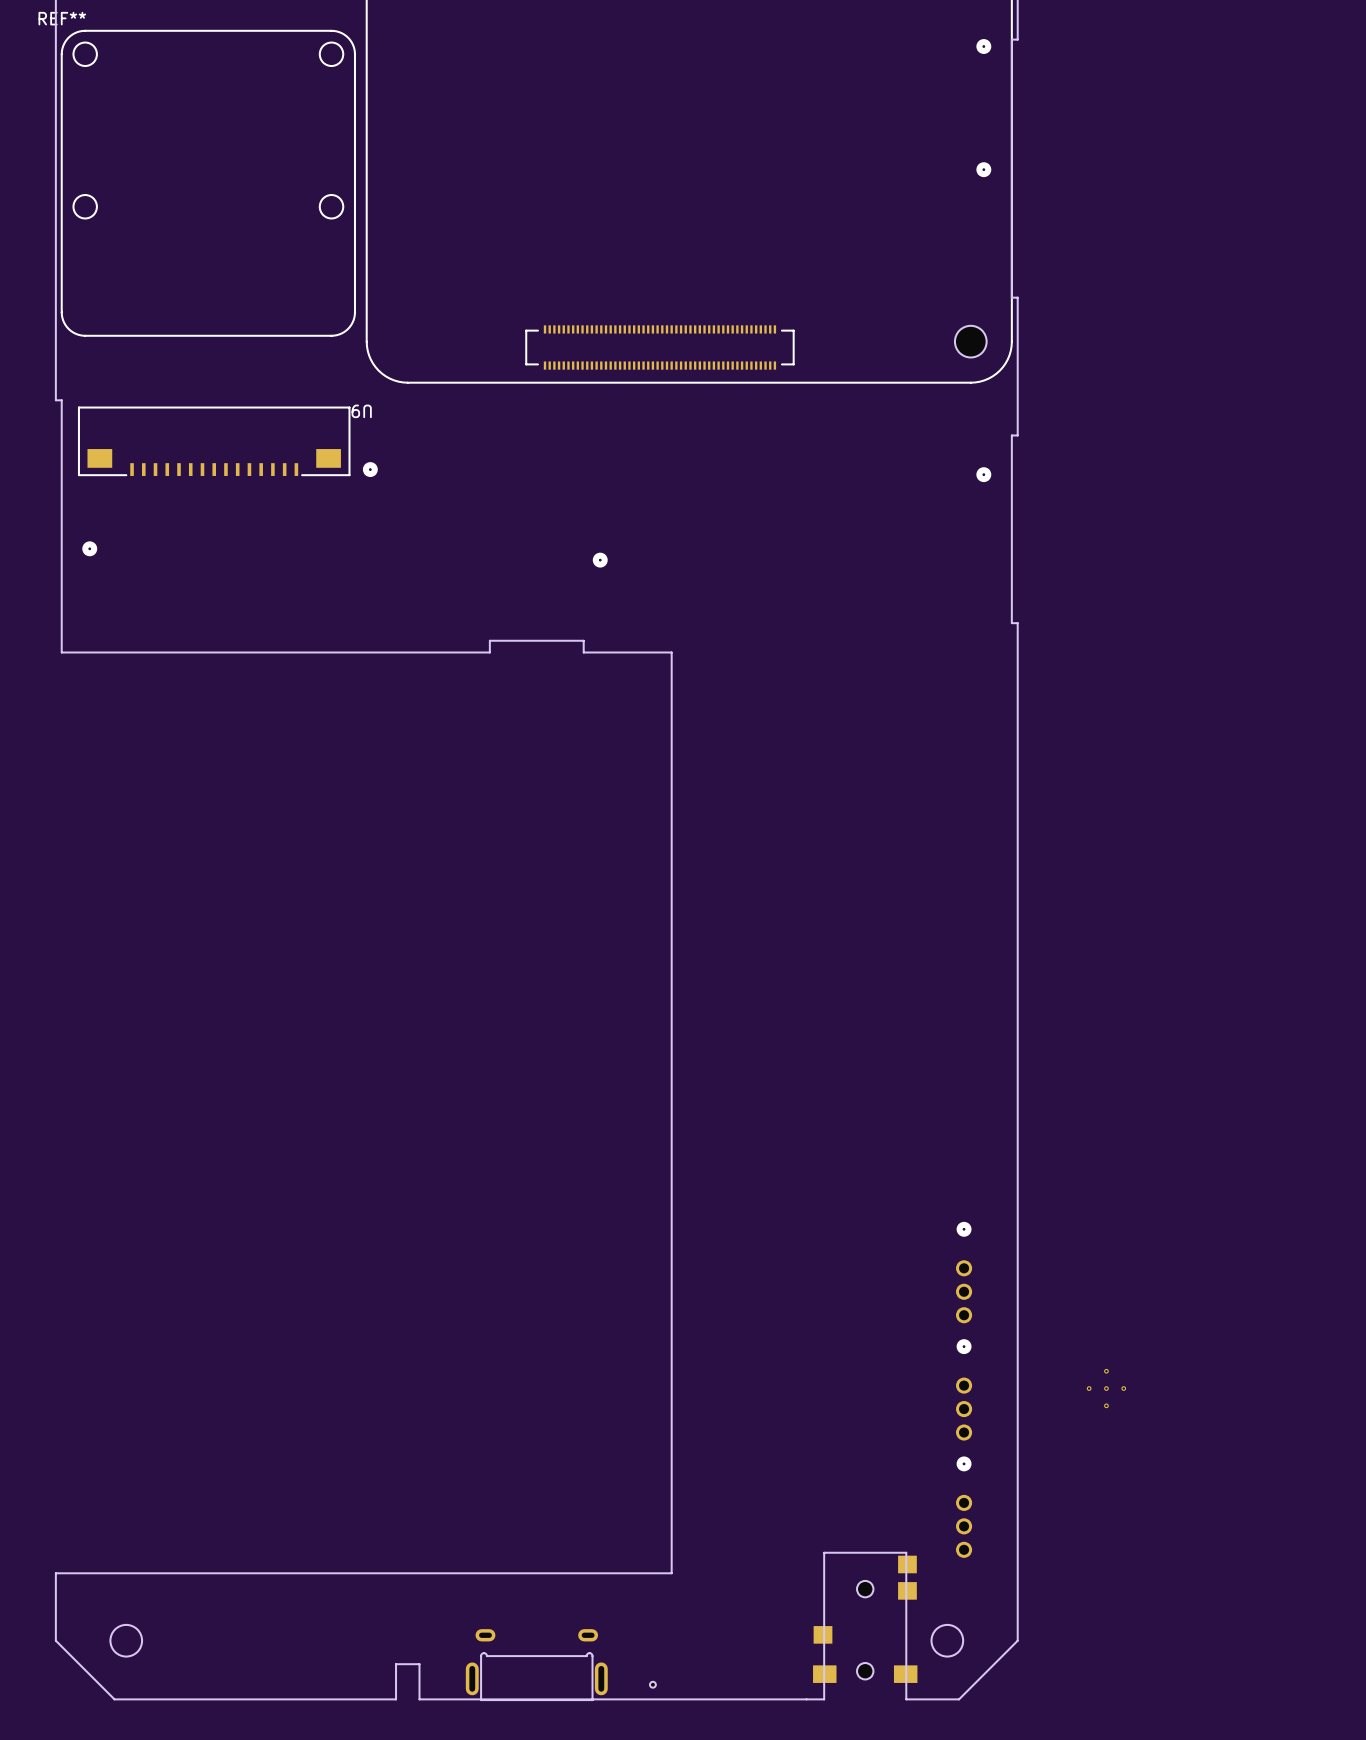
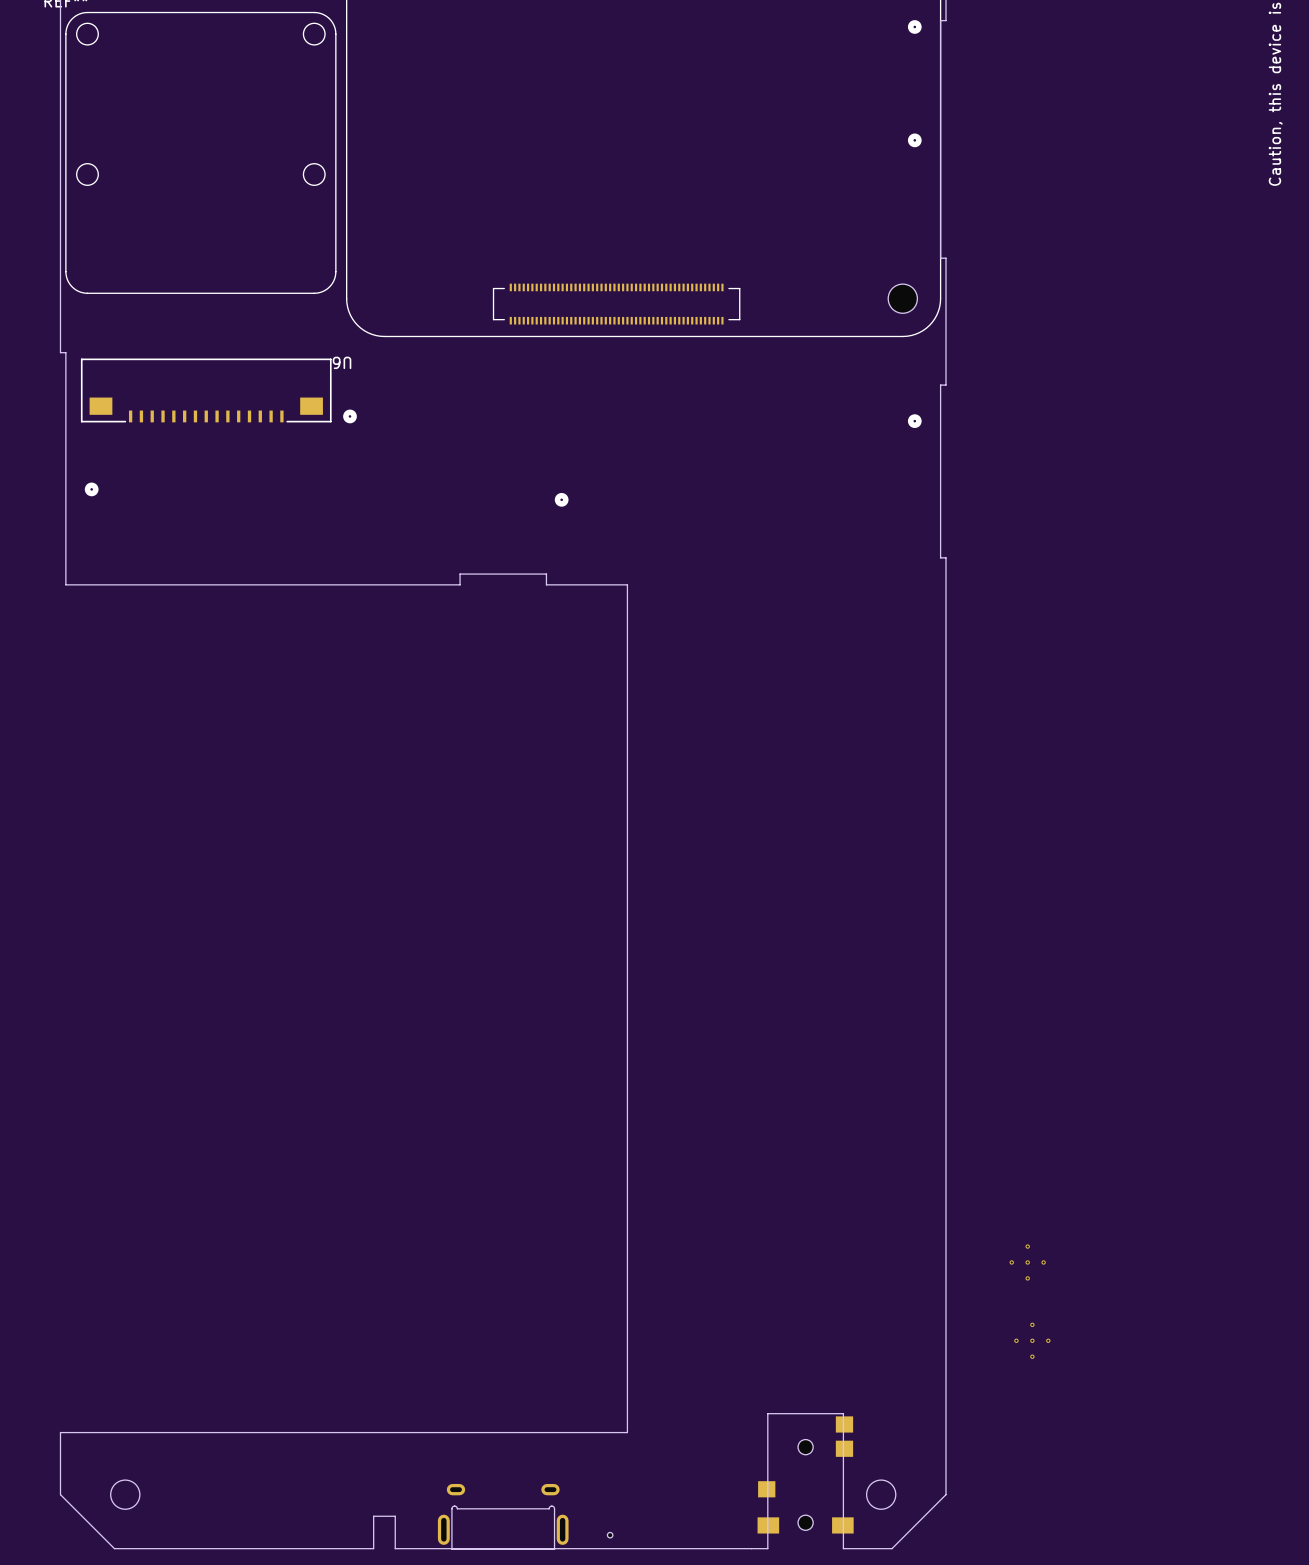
U9 name: U9 (361, 411) -> U6 (342, 362)
part: (964, 1272) -> none
part: (964, 1389) -> none
part: none -> (1032, 1340)
part: (964, 1507) -> none

